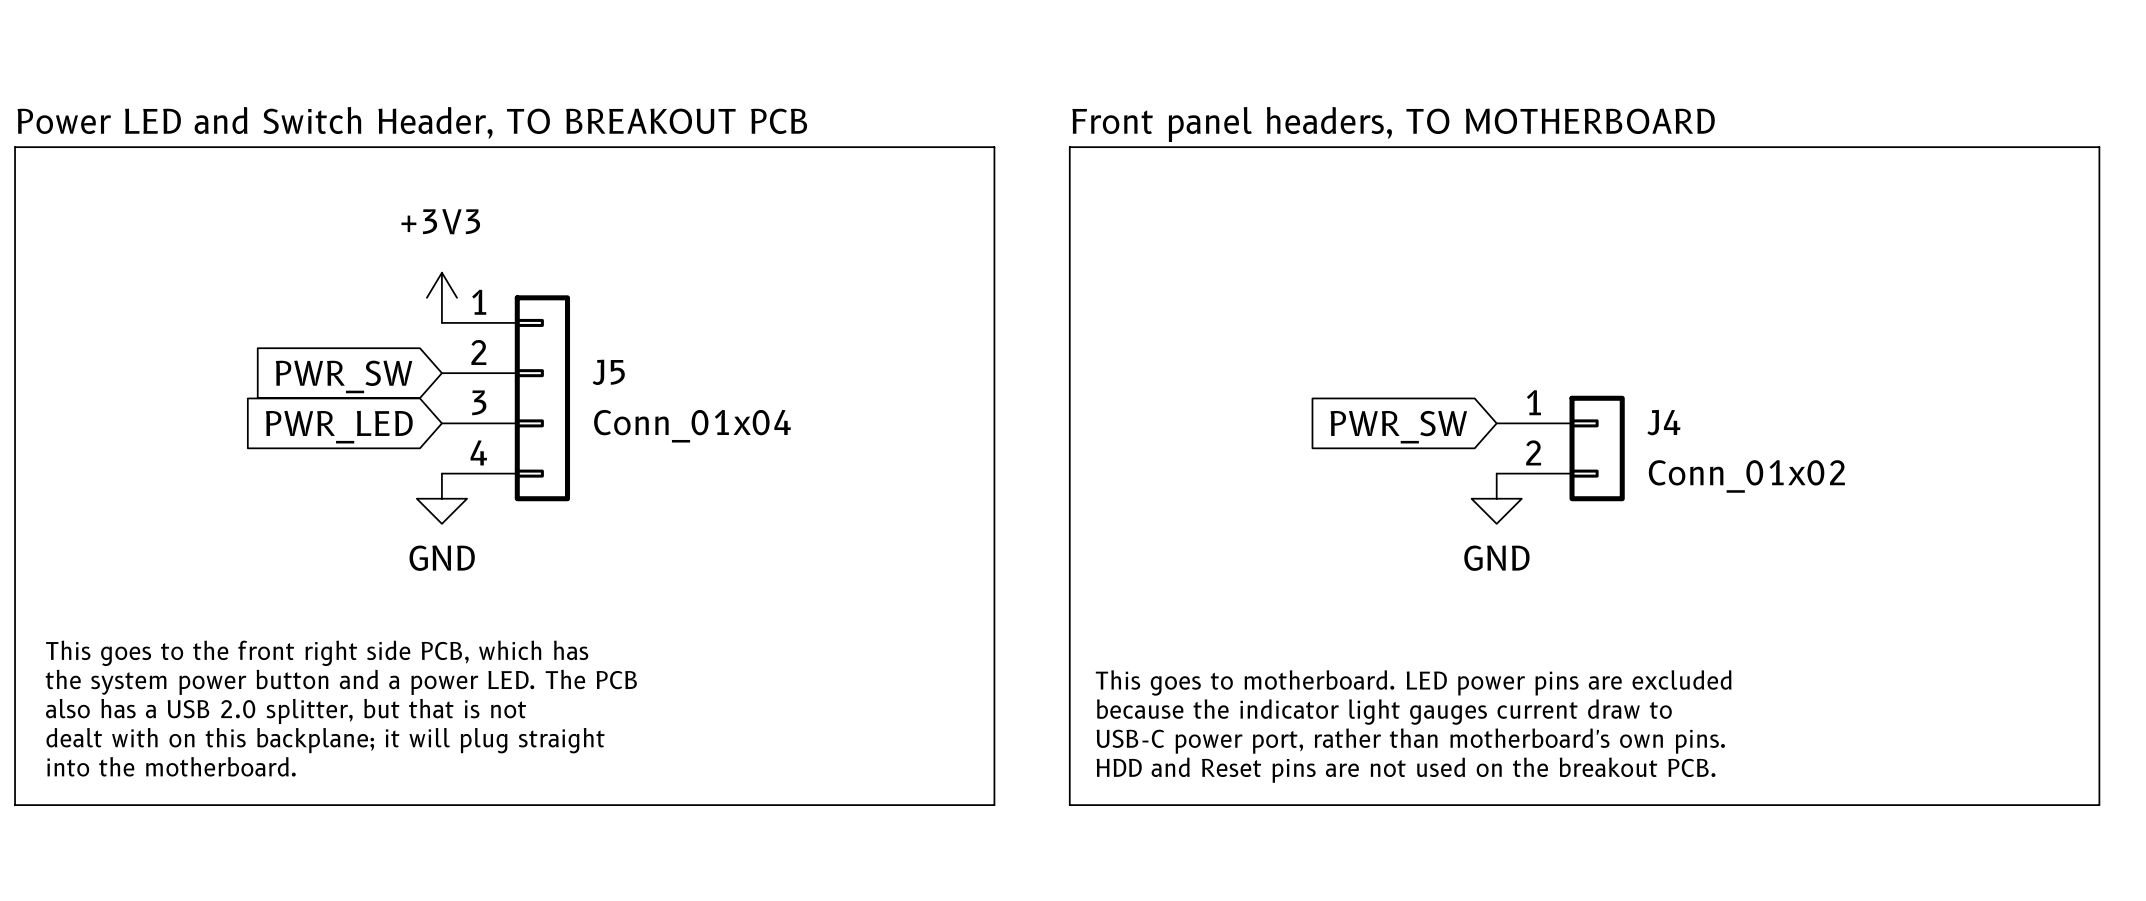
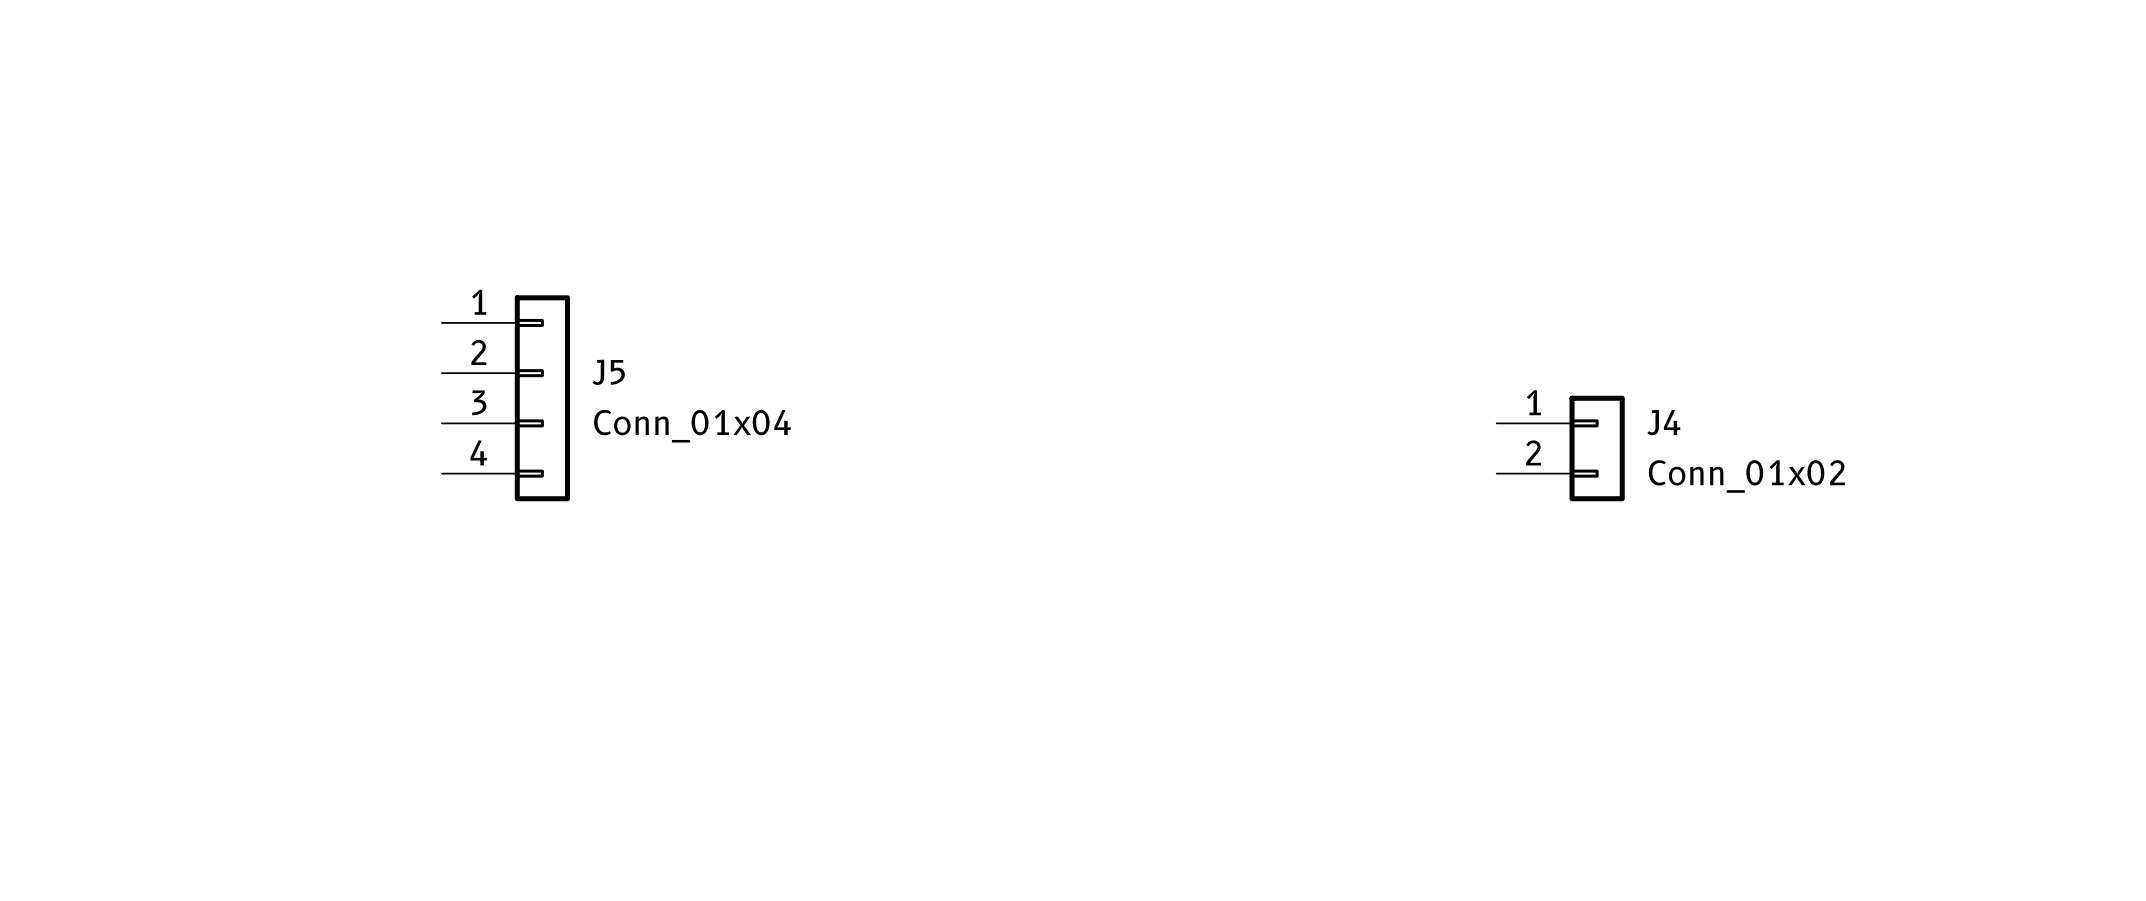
text: Power LED and Switch Header, TO BREAKOUT PCB (412, 122) -> none
text: Front panel headers, TO MOTHERBOARD (1393, 124) -> none
line: (15, 147) (994, 147) (994, 805) (15, 805) (15, 147) -> none
line: (1069, 147) (2099, 147) (2099, 805) (1069, 805) (1069, 147) -> none
power symbol: +3V3 (441, 297) -> none
global label: PWR_SW (344, 376) -> none
global label: PWR_LED (339, 427) -> none
global label: PWR_SW (1398, 427) -> none
power symbol: GND (441, 498) -> none
power symbol: GND (1496, 498) -> none
text: This goes to the front right side PCB, which has (317, 653) -> none
text: the system power button and a power LED. The PCB (341, 682) -> none
text: This goes to motherboard. LED power pins are excluded (1413, 682) -> none
text: also has a USB 2.0 splitter, but that is not (286, 711) -> none
text: because the indicator light gauges current draw to (1384, 712) -> none
text: dealt with on this backplane; it will plug straight (325, 740) -> none
text: USB-C power port, rather than motherboard's own pins. (1410, 741) -> none
text: into the motherboard. (171, 766) -> none
text: HDD and Reset pins are not used on the breakout PCB. (1406, 770) -> none

